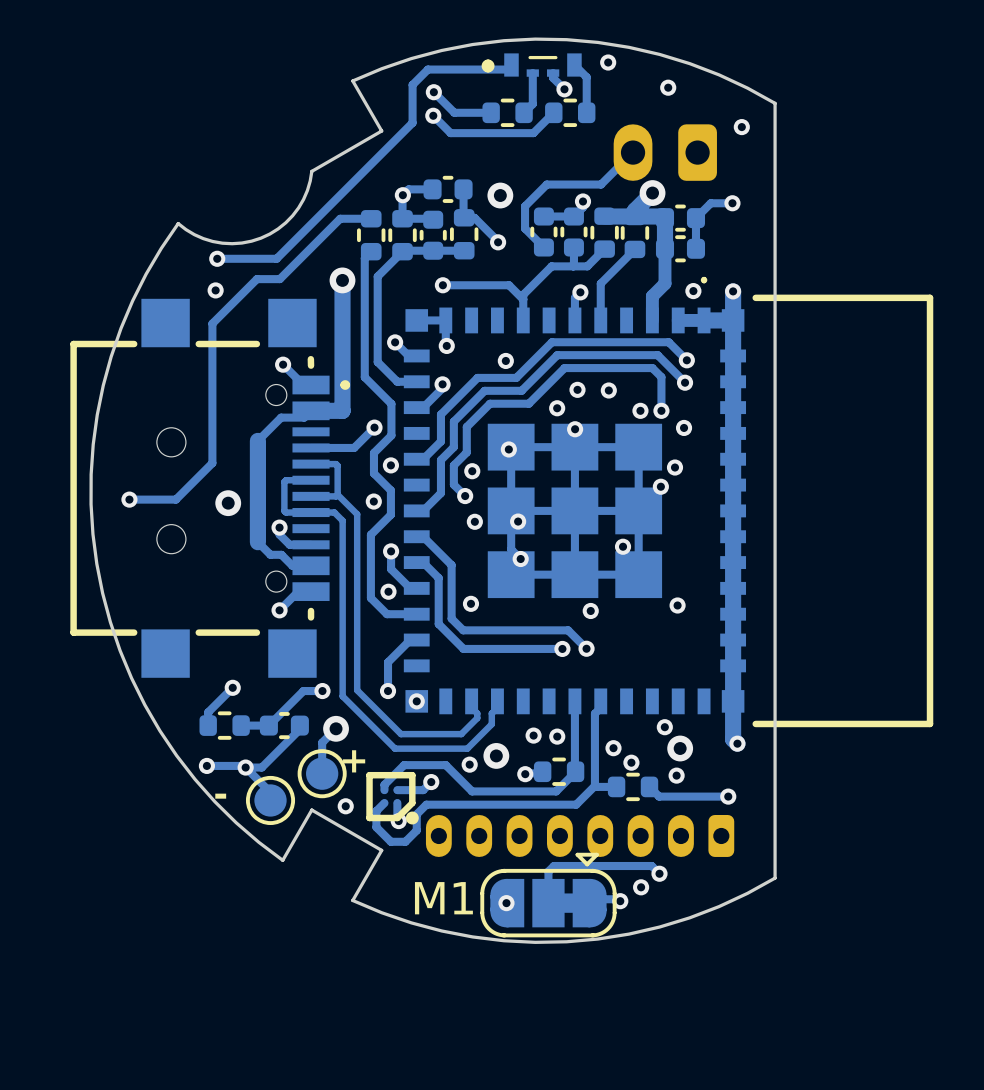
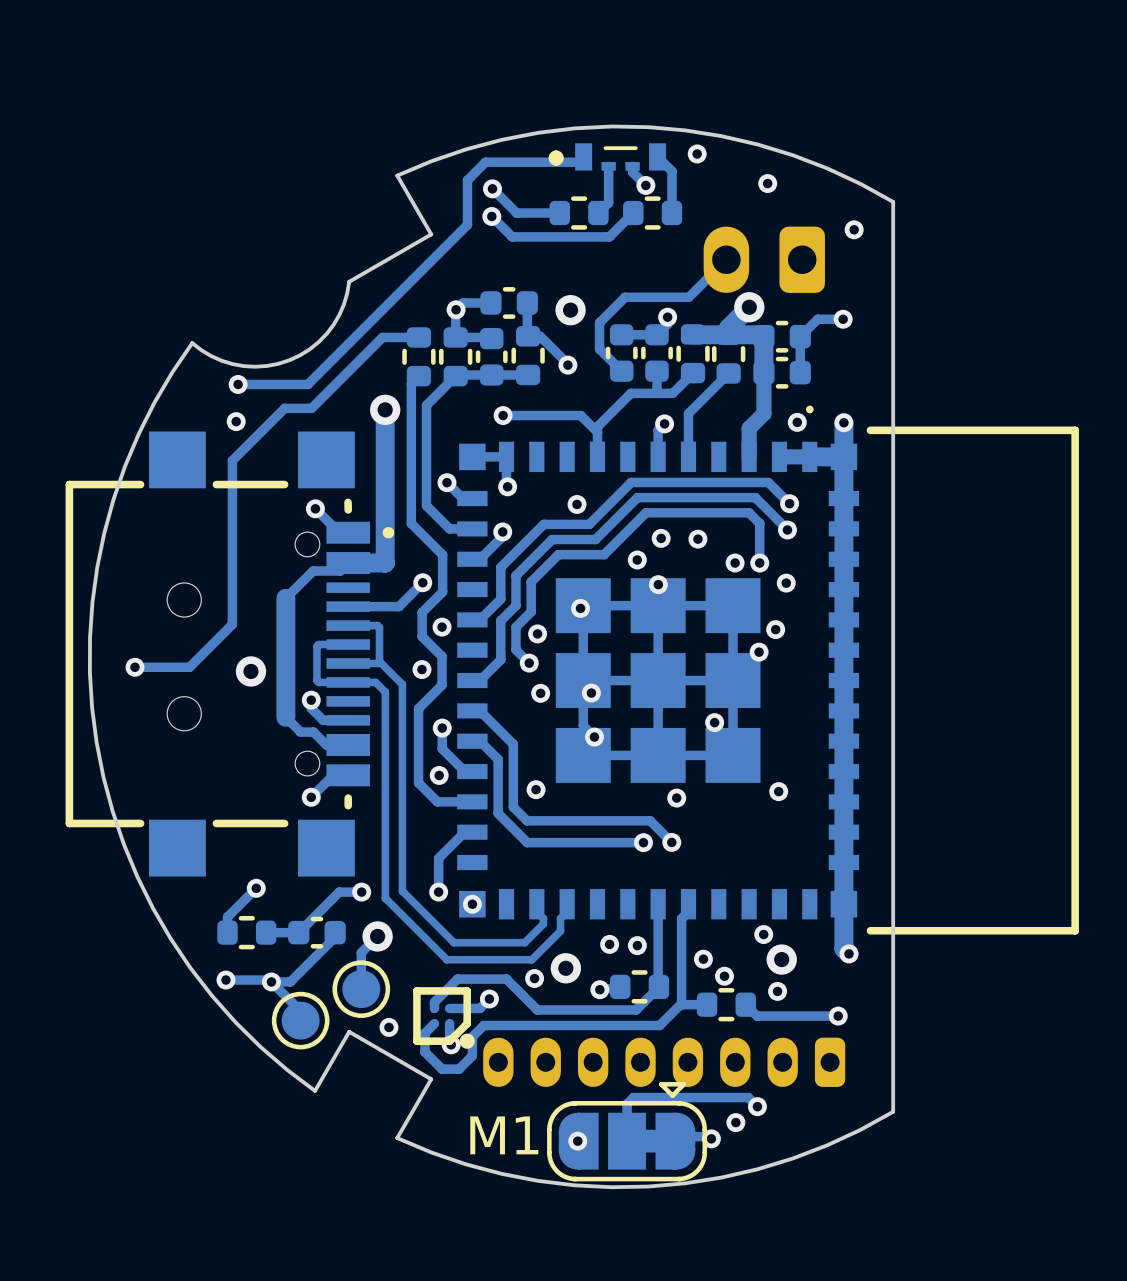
text: + (354, 761) -> none
text: - (220, 796) -> none

